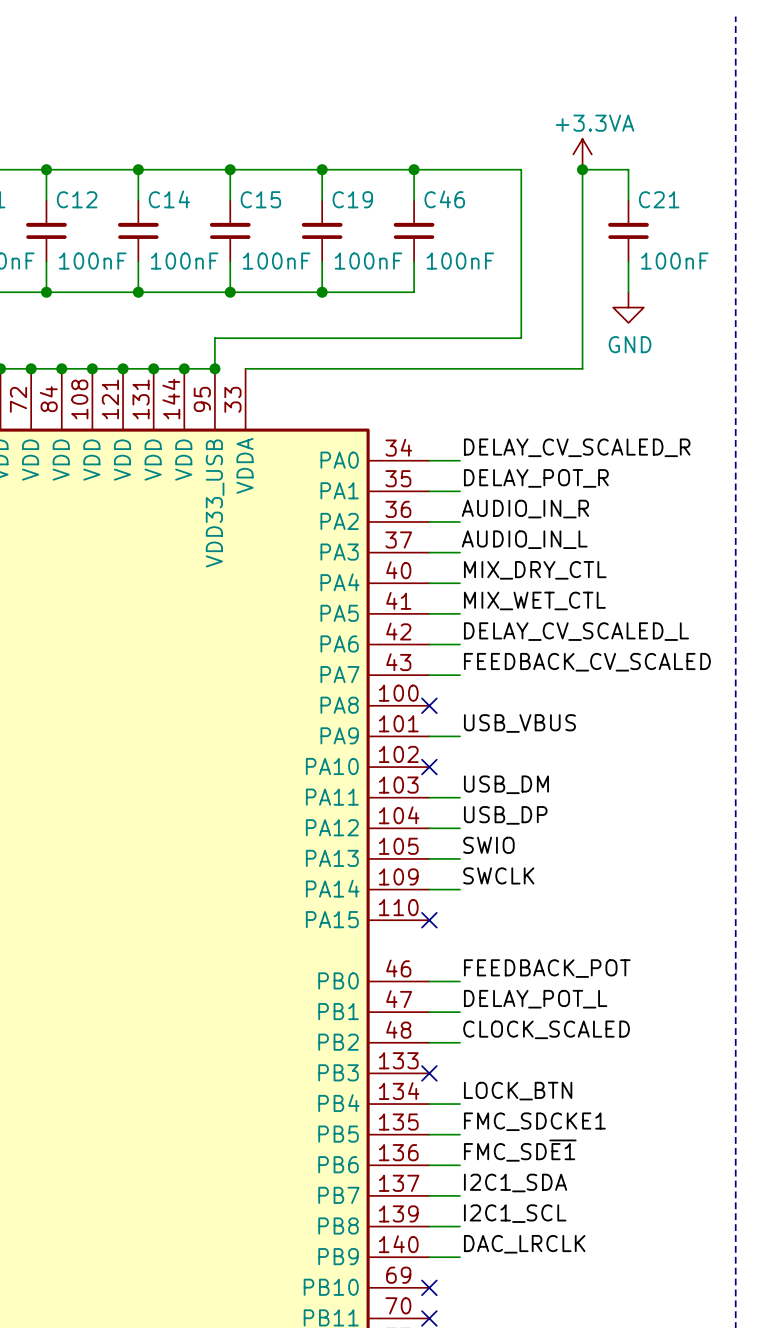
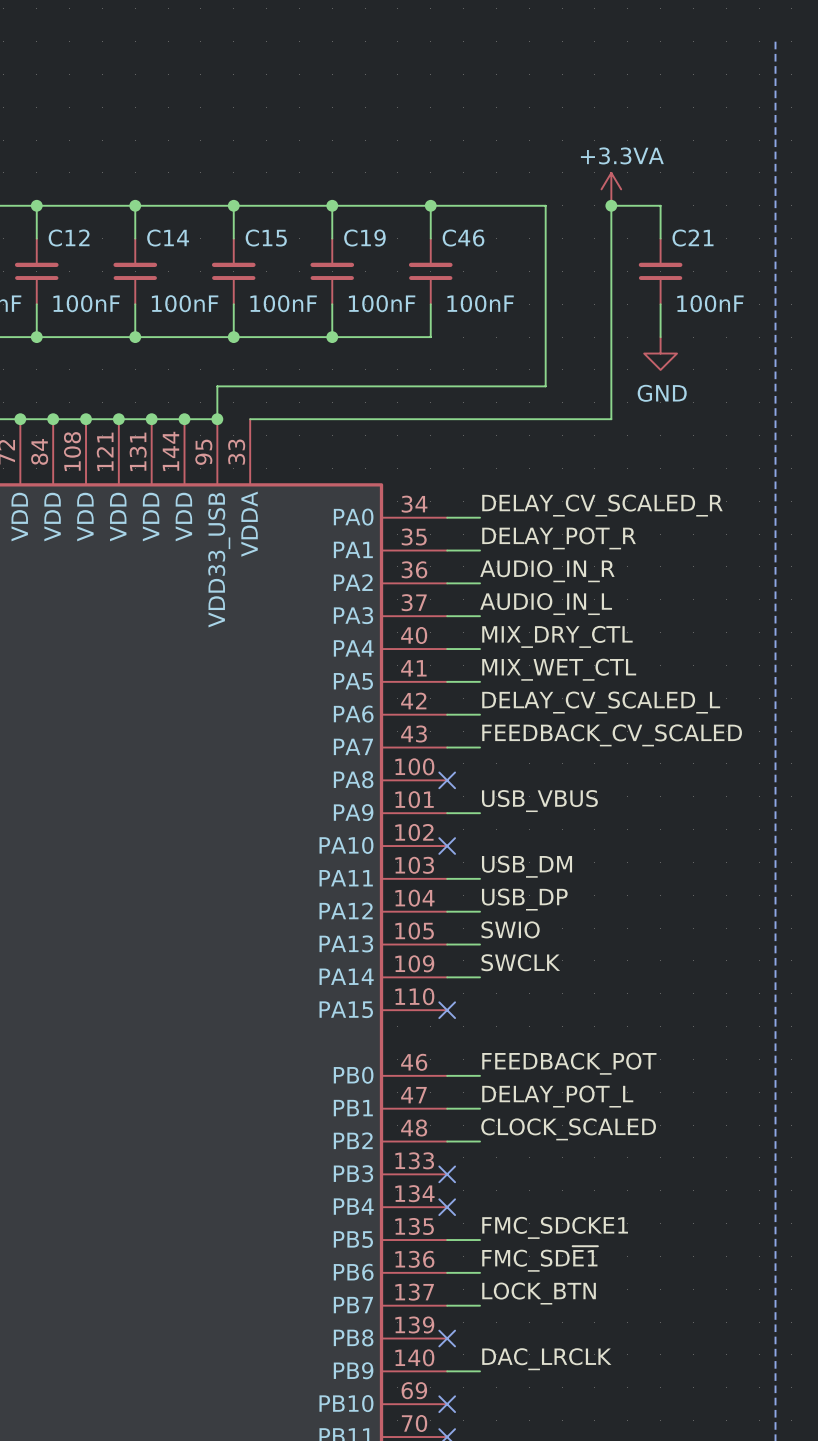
label: LOCK_BTN (518, 1091) -> none
wire: (429, 1104) (460, 1104) -> none
no-connect mark: none -> (447, 1207)
label: I2C1_SDA (515, 1182) -> LOCK_BTN (539, 1293)
label: I2C1_SCL (515, 1213) -> none
wire: (429, 1226) (460, 1226) -> none
no-connect mark: none -> (447, 1338)

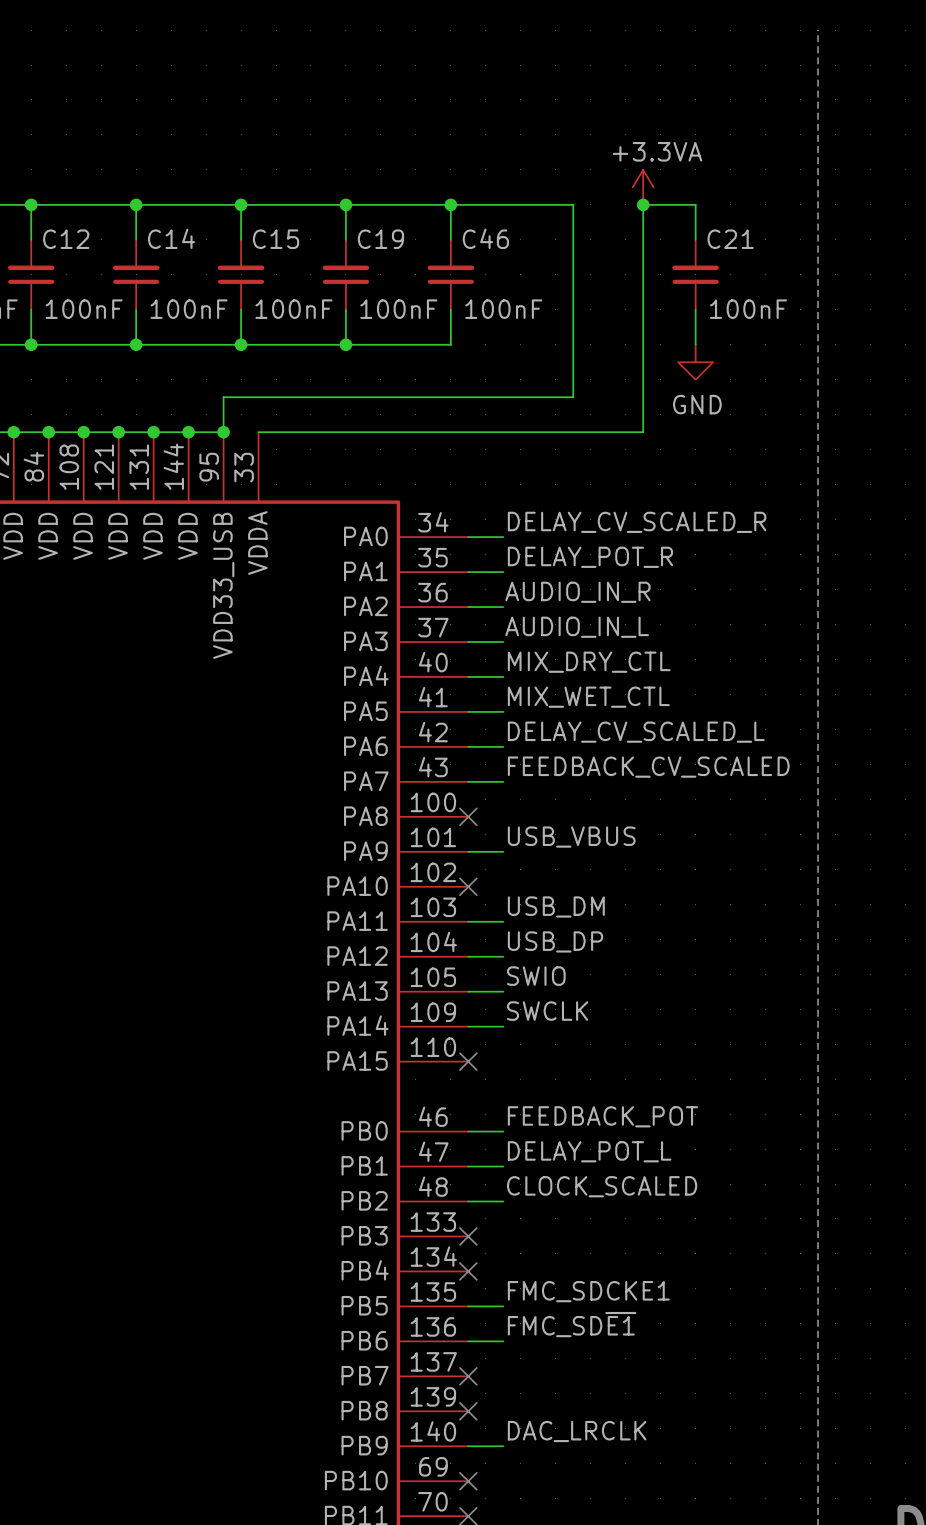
label: LOCK_BTN (539, 1293) -> none
wire: (447, 1305) (480, 1305) -> none
no-connect mark: none -> (468, 1376)

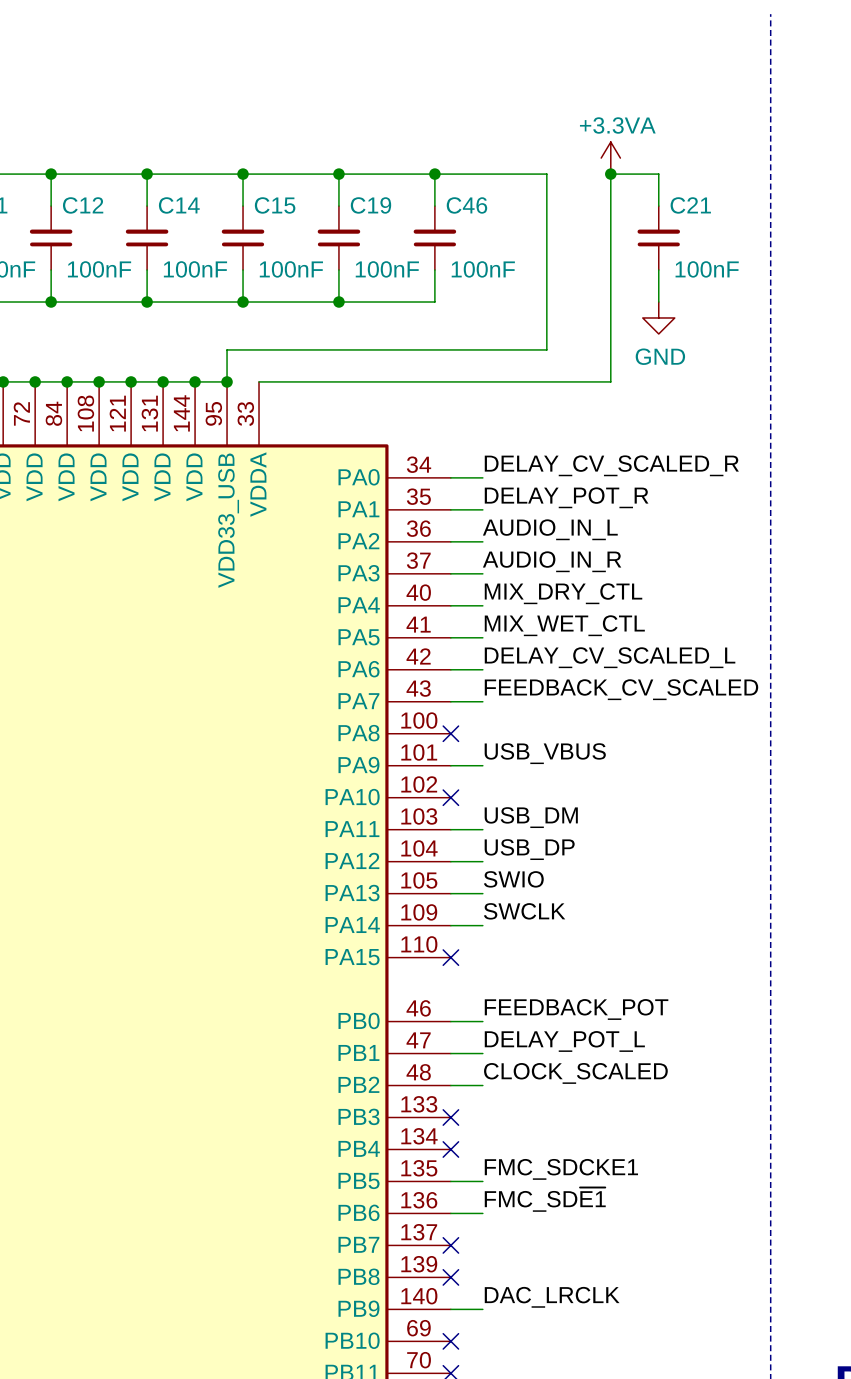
label: AUDIO_IN_R (577, 592) -> AUDIO_IN_L (550, 529)
label: AUDIO_IN_L (577, 627) -> AUDIO_IN_R (552, 561)

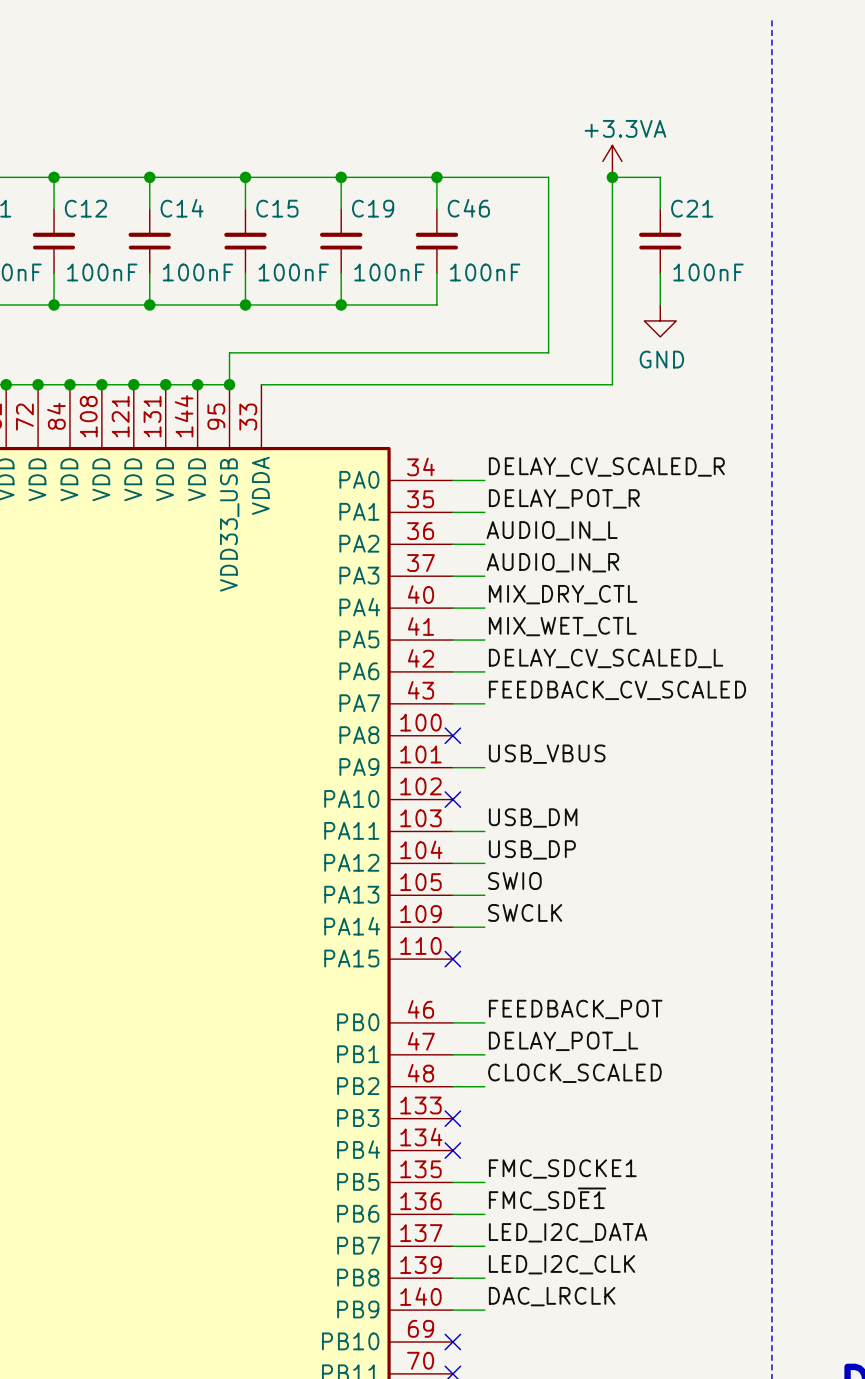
label: none -> LED_I2C_DATA (568, 1232)
wire: none -> (452, 1246) (484, 1246)
no-connect mark: (450, 1245) -> none
label: none -> LED_I2C_CLK (562, 1264)
wire: none -> (452, 1278) (484, 1278)
no-connect mark: (450, 1277) -> none

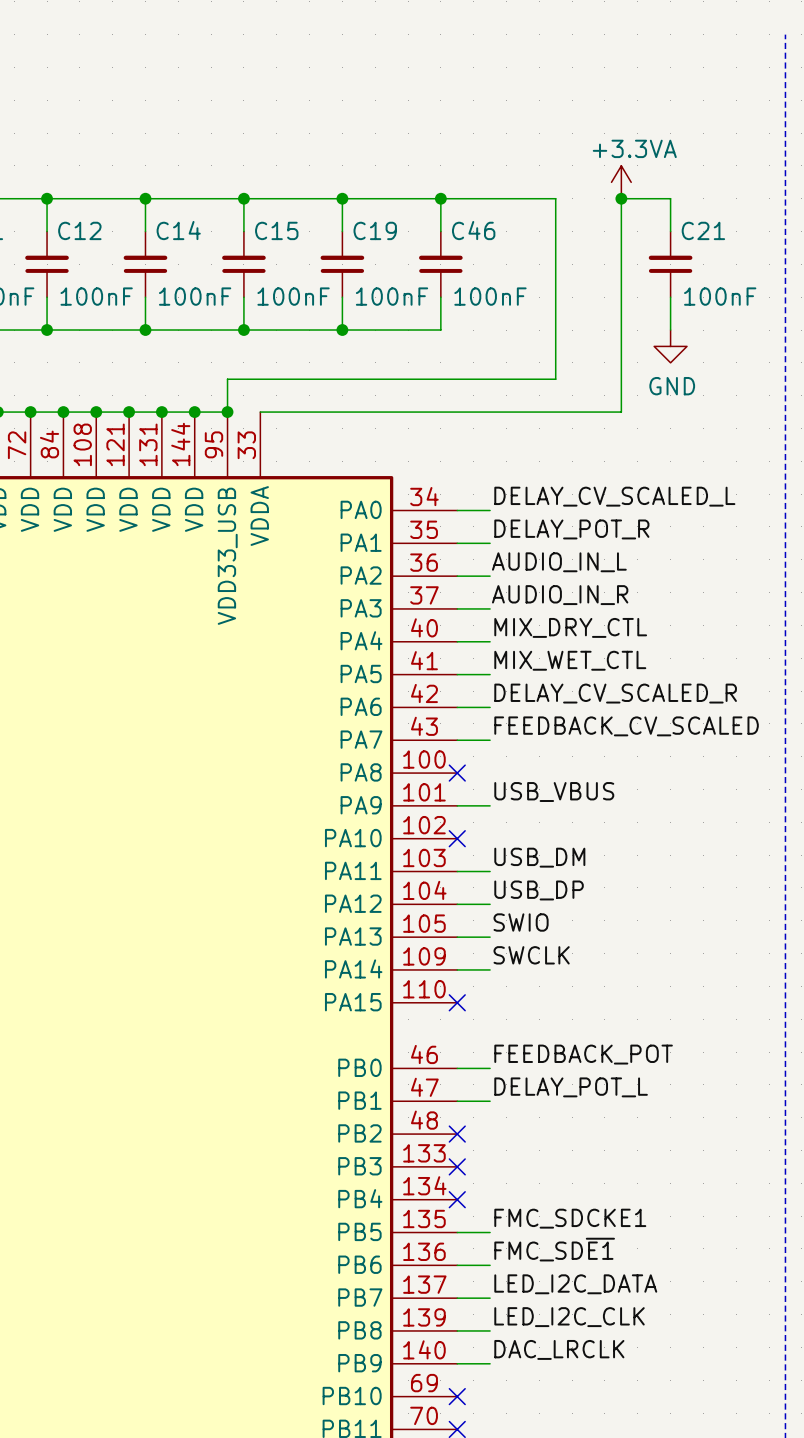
label: DELAY_CV_SCALED_R (606, 467) -> DELAY_CV_SCALED_L (614, 496)
label: DELAY_CV_SCALED_L (606, 658) -> DELAY_CV_SCALED_R (615, 693)
label: CLOCK_SCALED (574, 1073) -> none
wire: (452, 1086) (484, 1086) -> none
no-connect mark: none -> (457, 1134)

